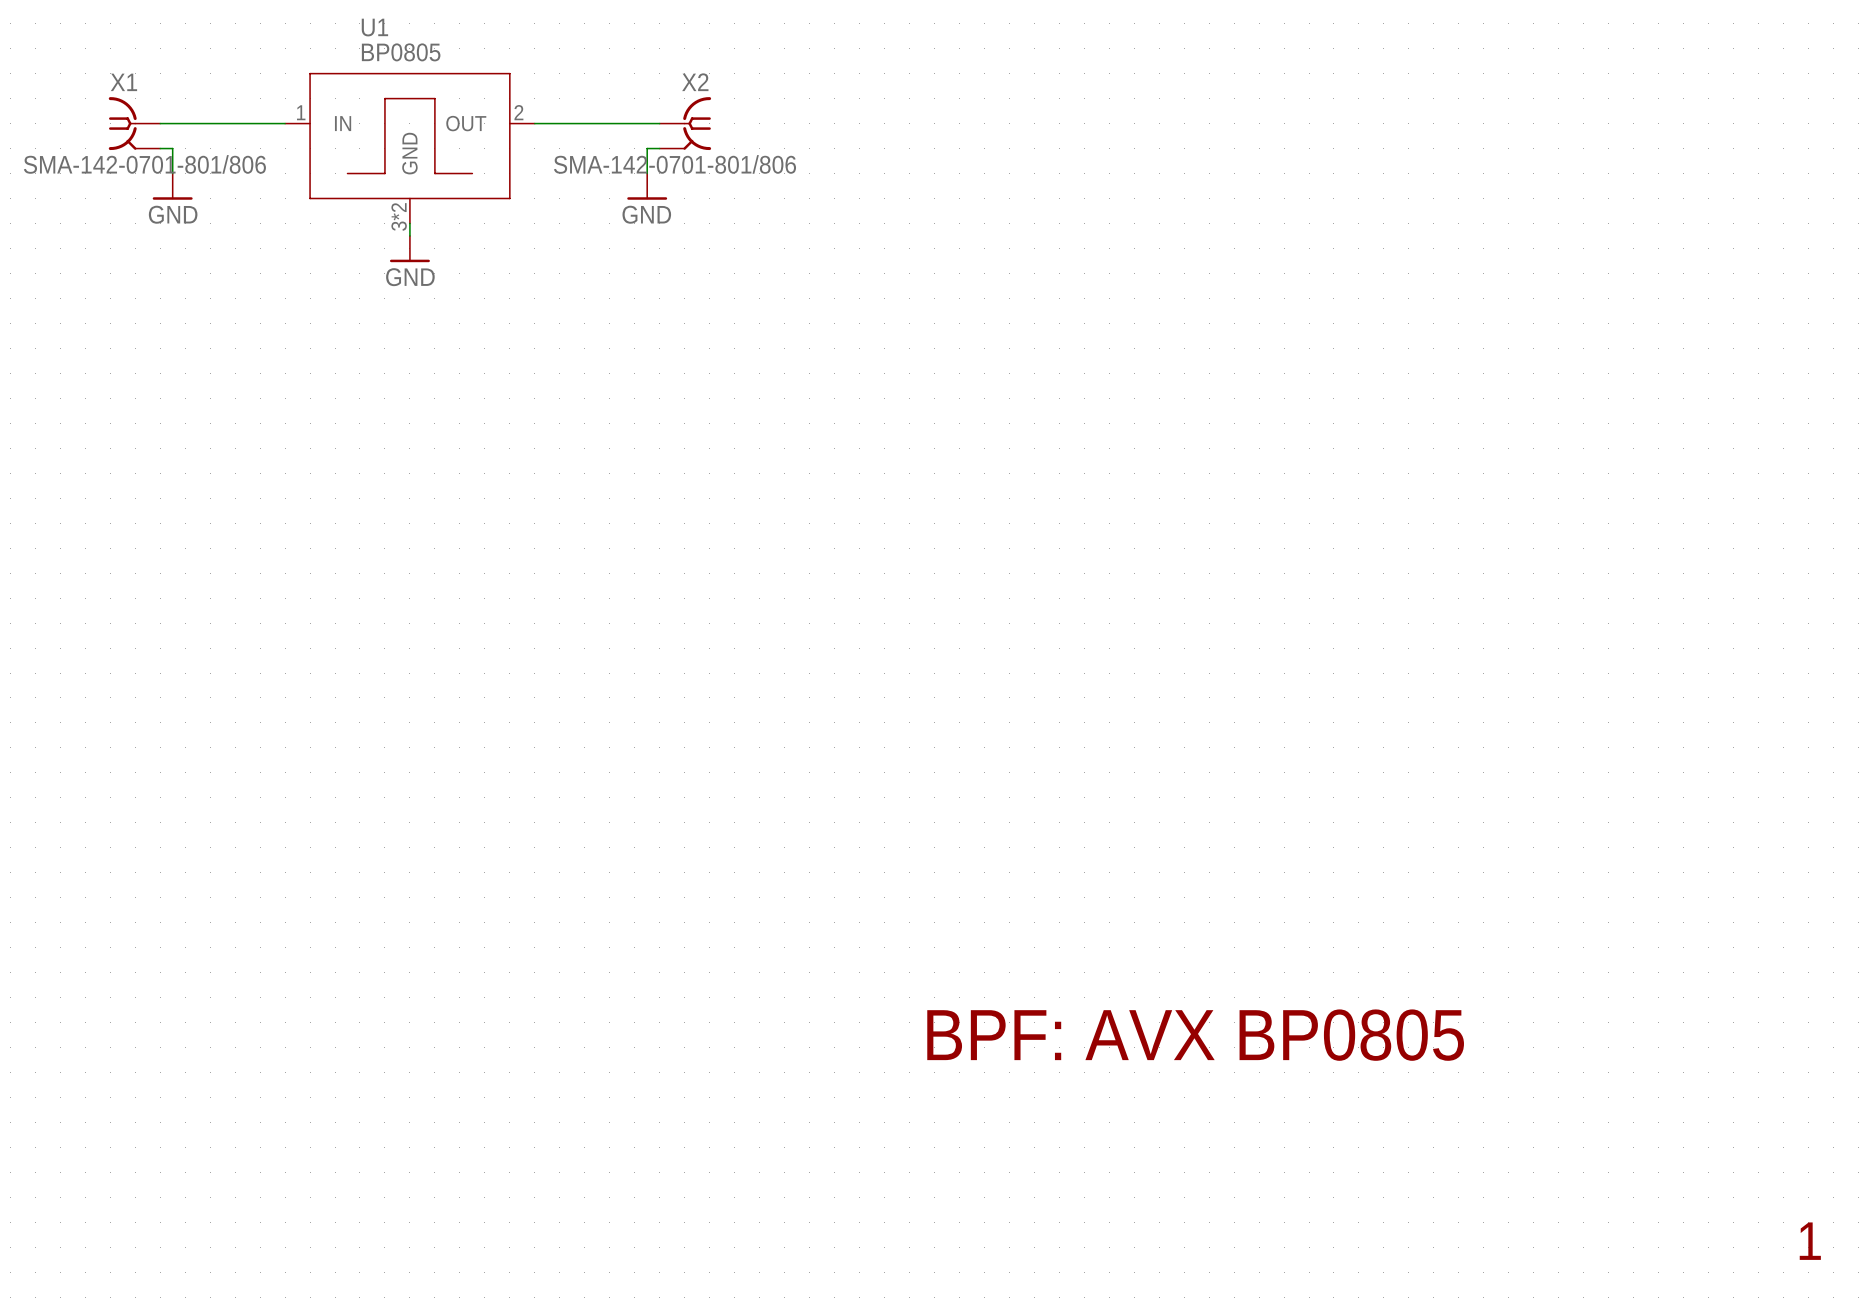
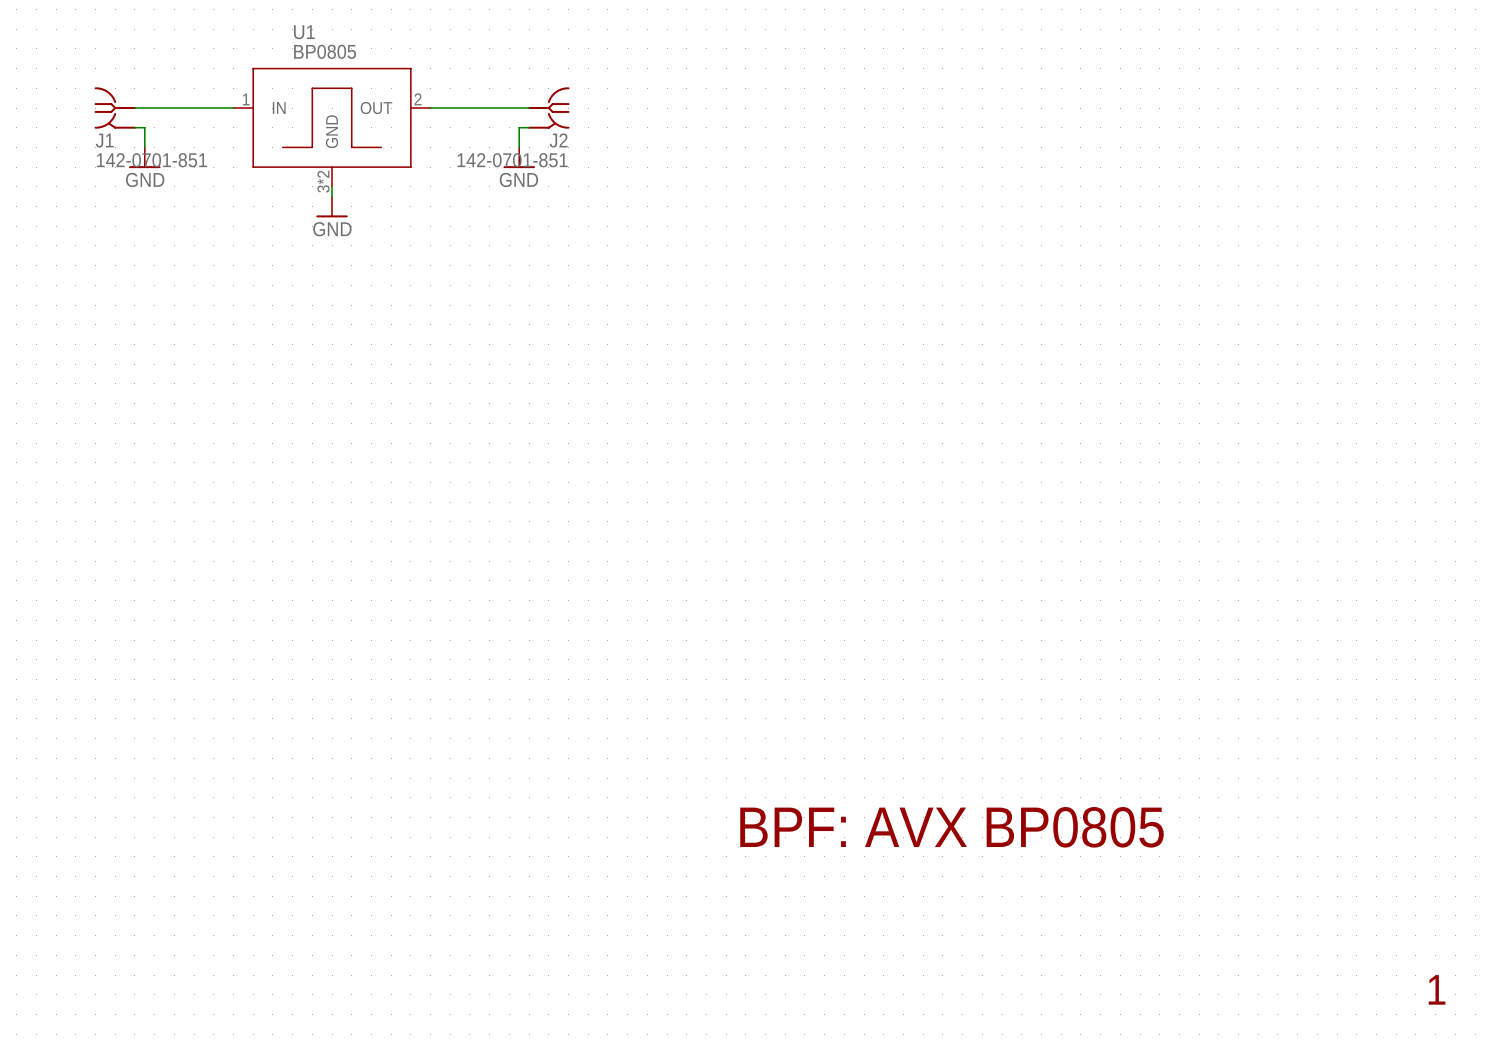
X1: SMA-142-0701-801/806 (134, 123) -> none
J1: none -> 142-0701-851 (115, 108)
J2: none -> 142-0701-851 (548, 108)
X2: SMA-142-0701-801/806 (685, 123) -> none

